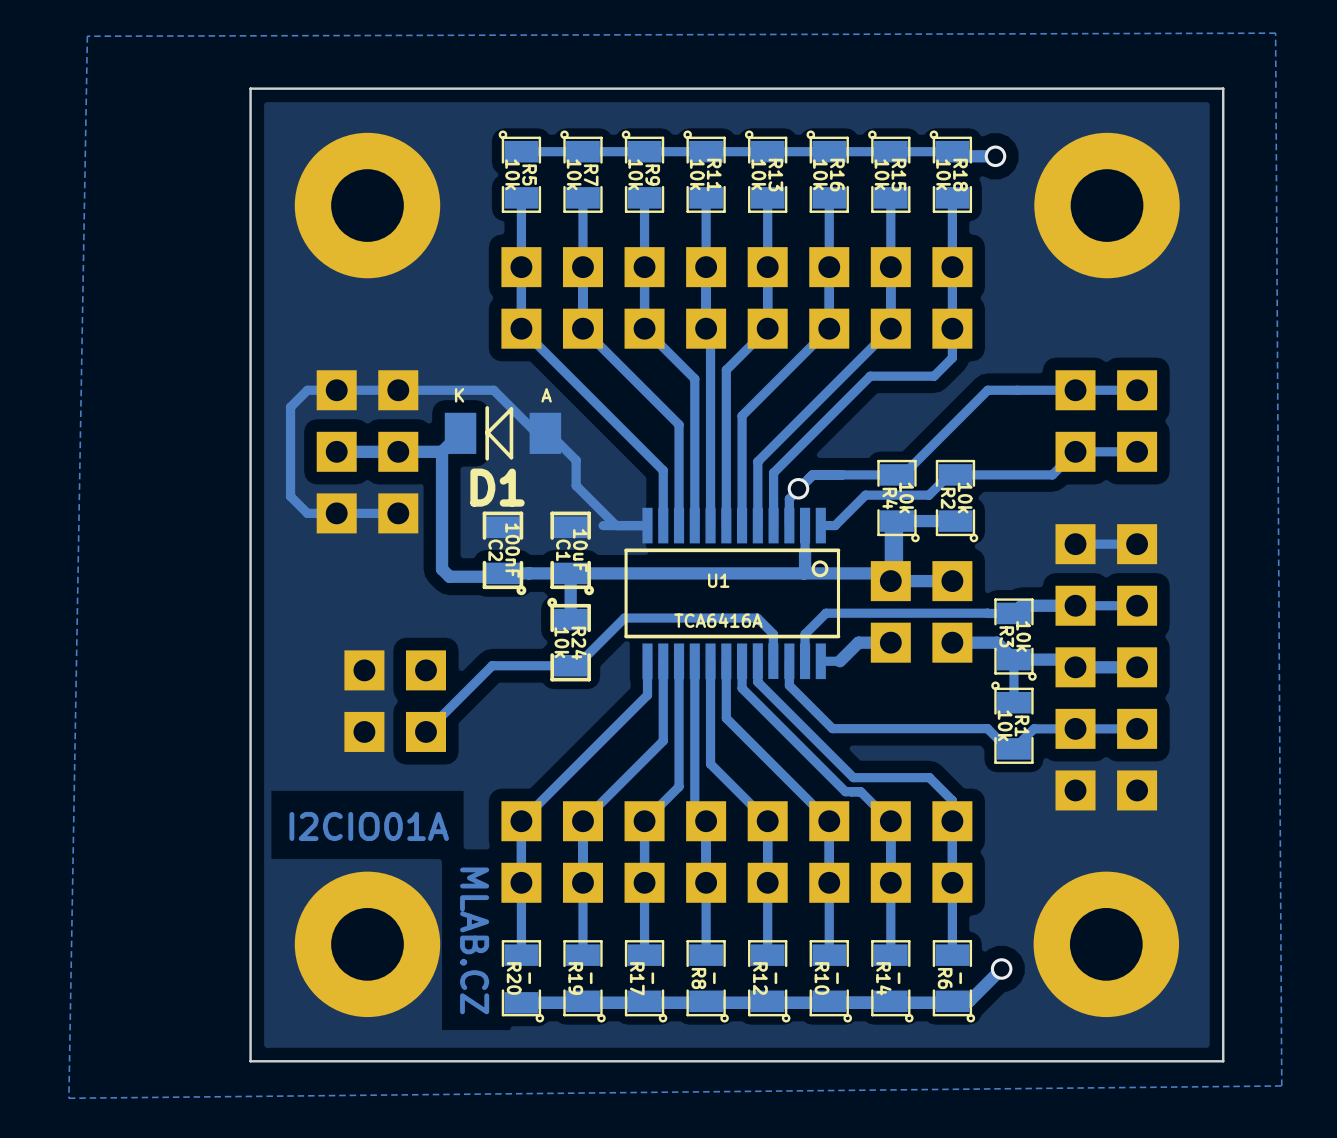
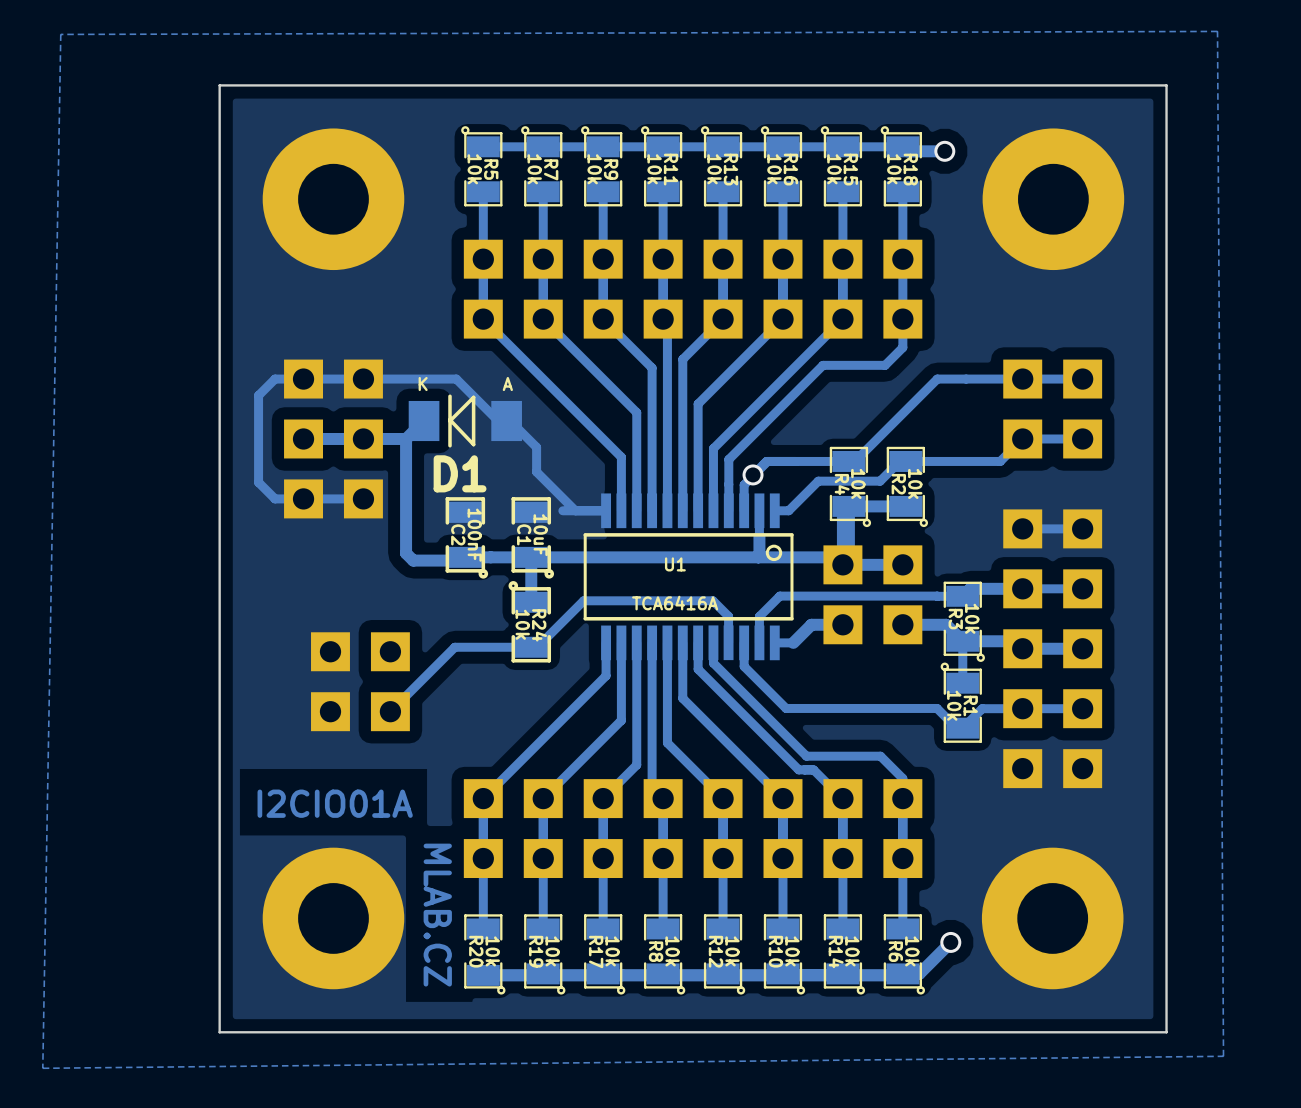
R20 value: - (529, 978) -> 10k (492, 951)
R19 value: - (591, 978) -> 10k (552, 951)
R17 value: - (652, 978) -> 10k (612, 951)
R8 value: - (714, 978) -> 10k (672, 951)
R12 value: - (775, 978) -> 10k (732, 951)
R10 value: - (837, 978) -> 10k (792, 951)
R14 value: - (899, 978) -> 10k (852, 951)
R6 value: - (960, 978) -> 10k (912, 951)

